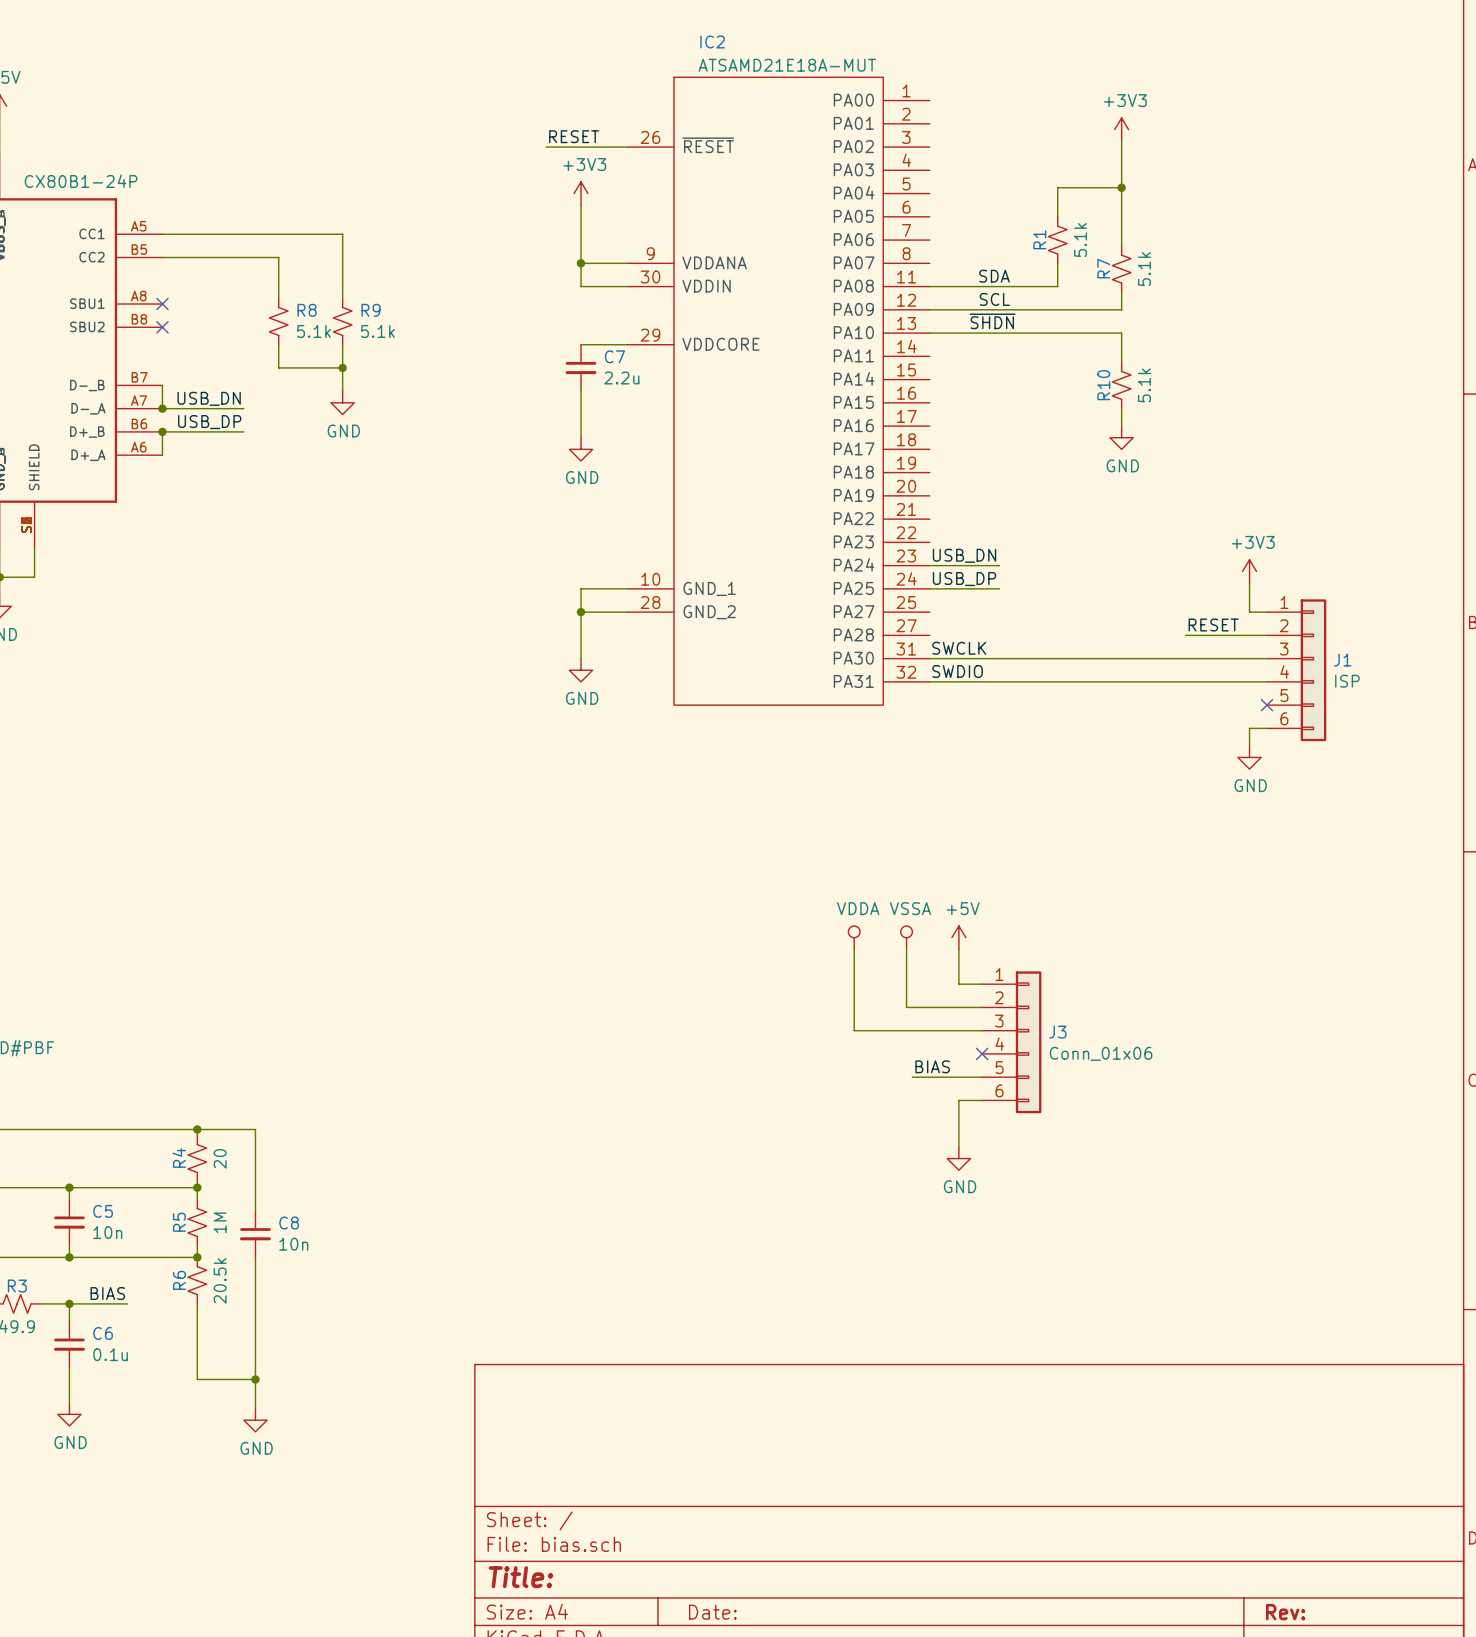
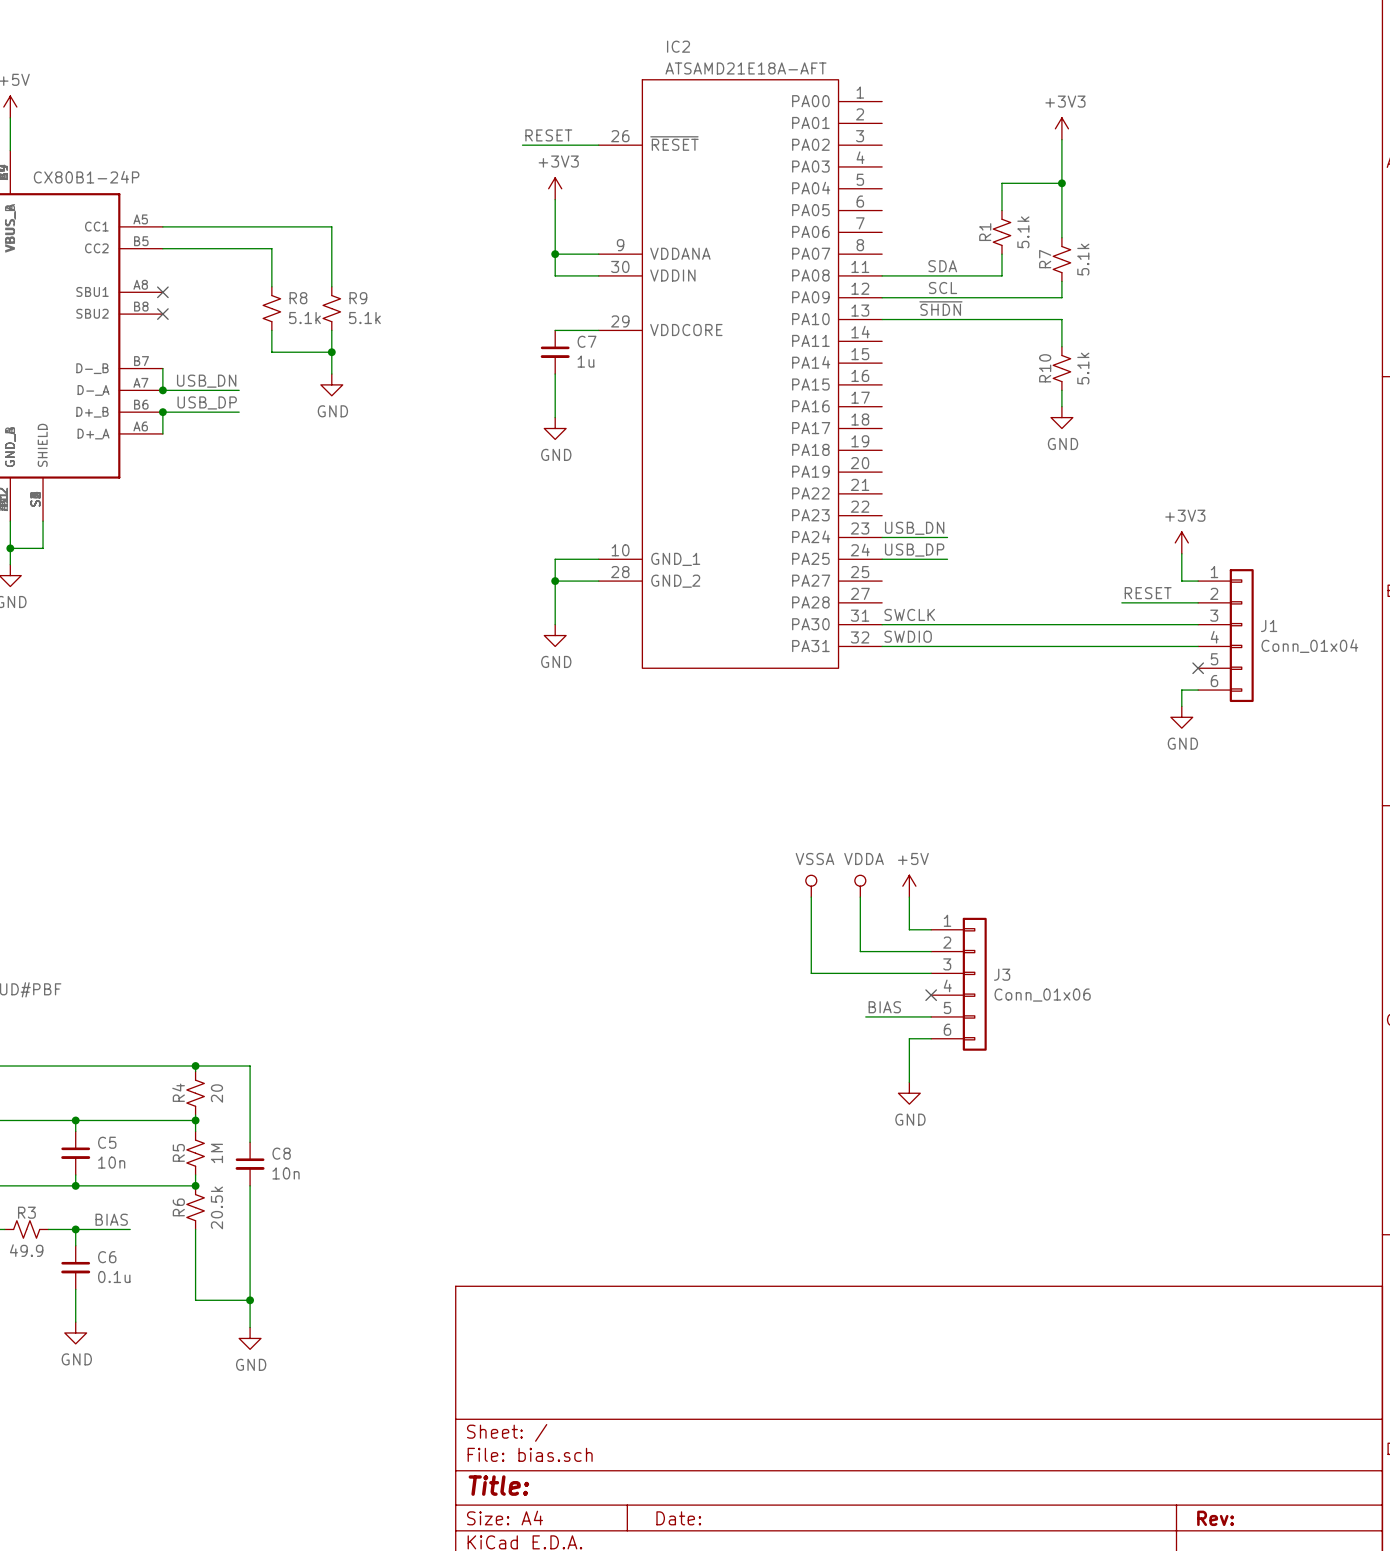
IC2 value: ATSAMD21E18A-MUT (787, 65) -> ATSAMD21E18A-AFT (745, 68)
C7 value: 2.2u (621, 377) -> 1u (585, 361)
J1 value: ISP (1347, 681) -> Conn_01x04 (1309, 646)
power symbol: VDDA (854, 937) -> VSSA (811, 886)
power symbol: VSSA (906, 937) -> VDDA (860, 886)

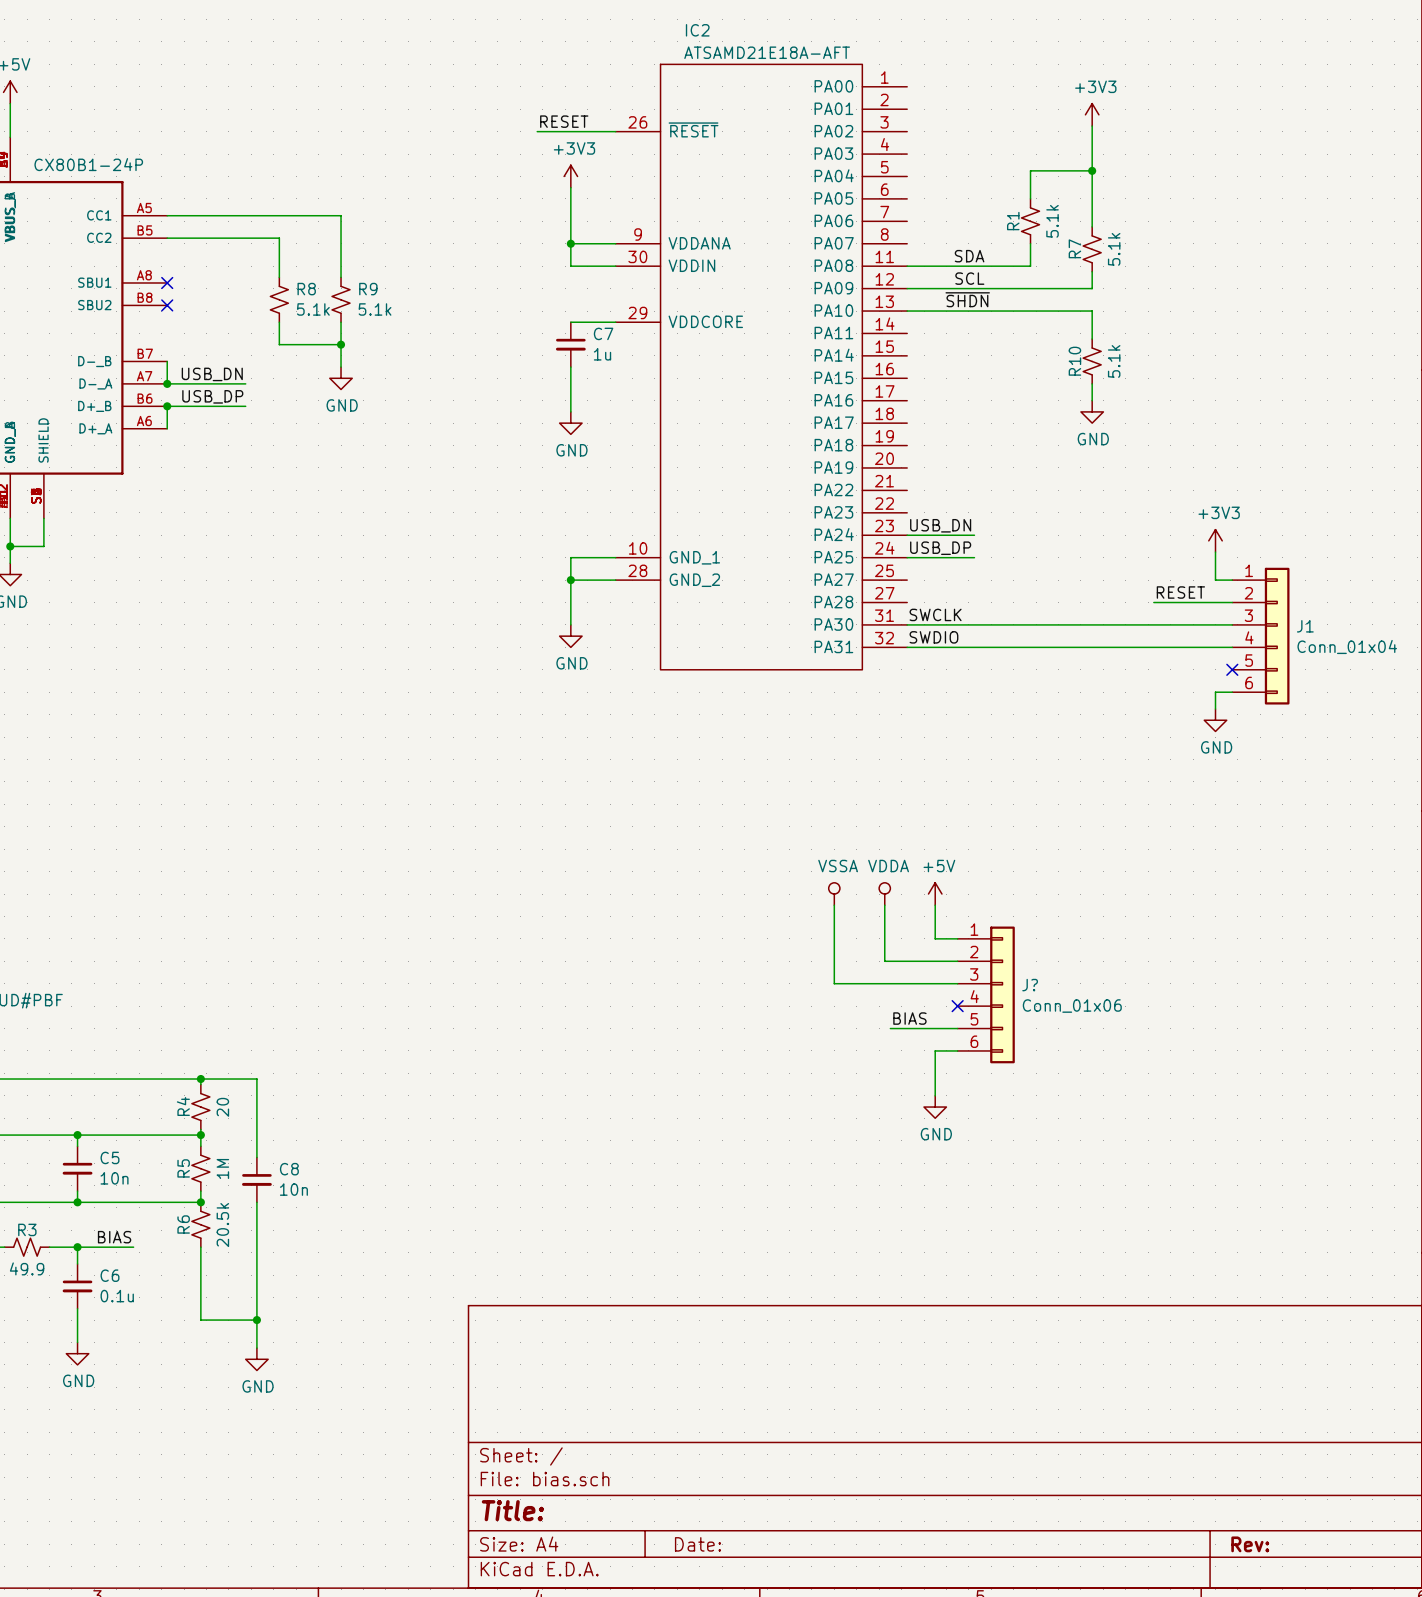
J3 name: J3 (1002, 974) -> J? (1030, 985)

